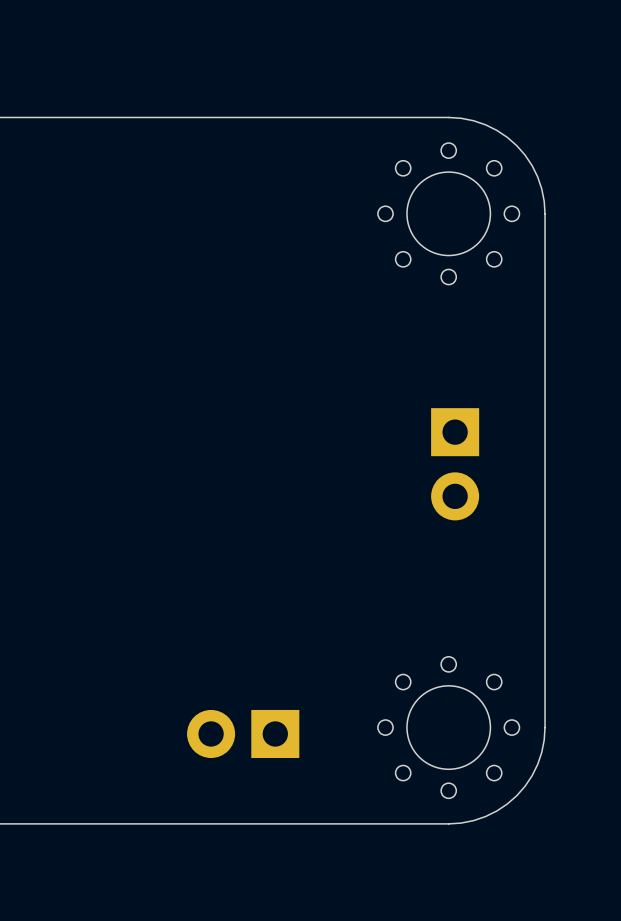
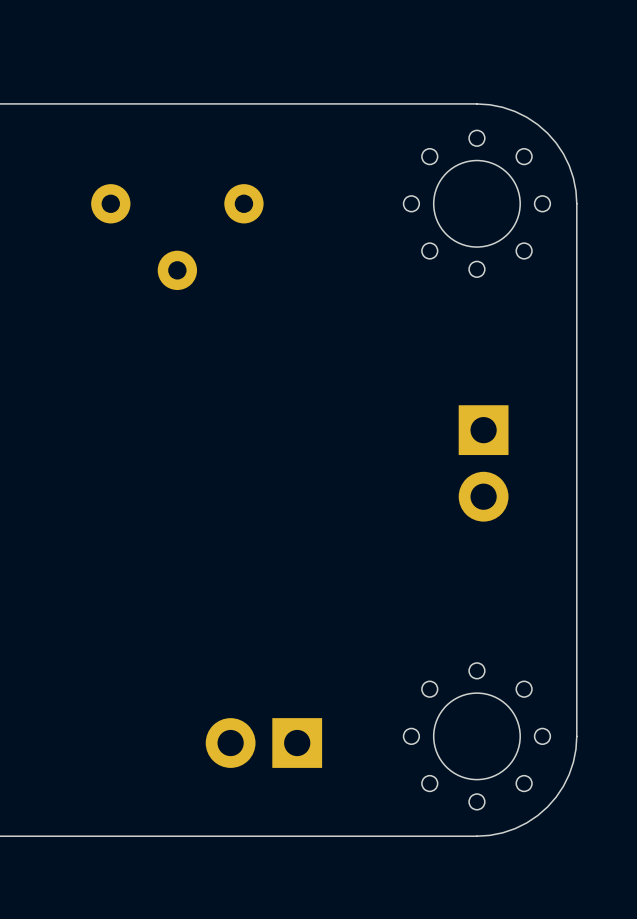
part: none -> (110, 203)
part: none -> (243, 203)
part: none -> (177, 270)

